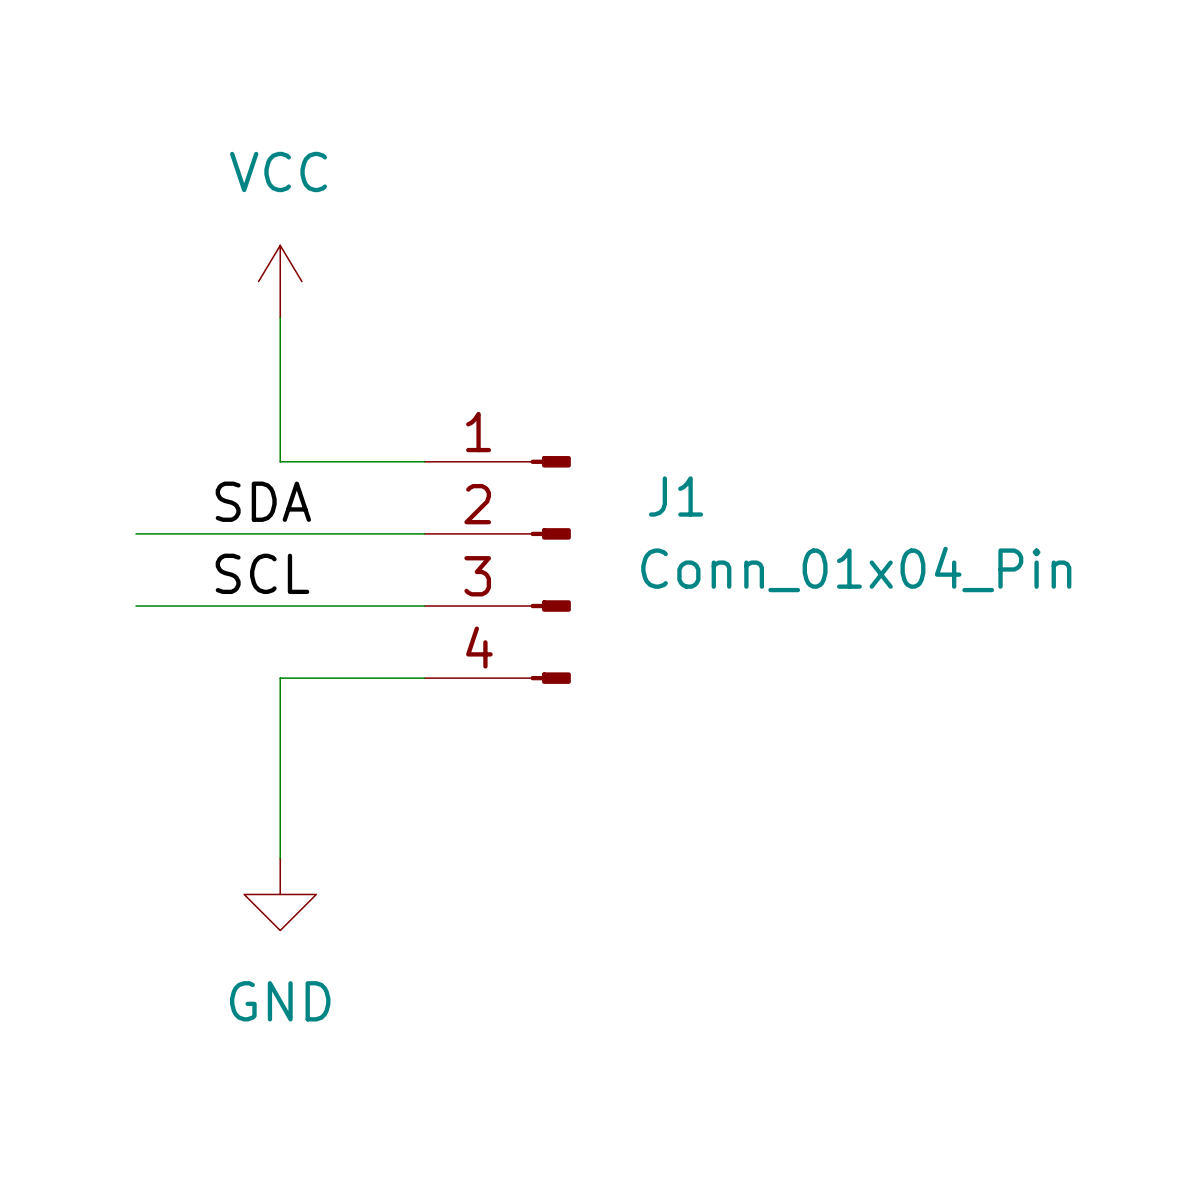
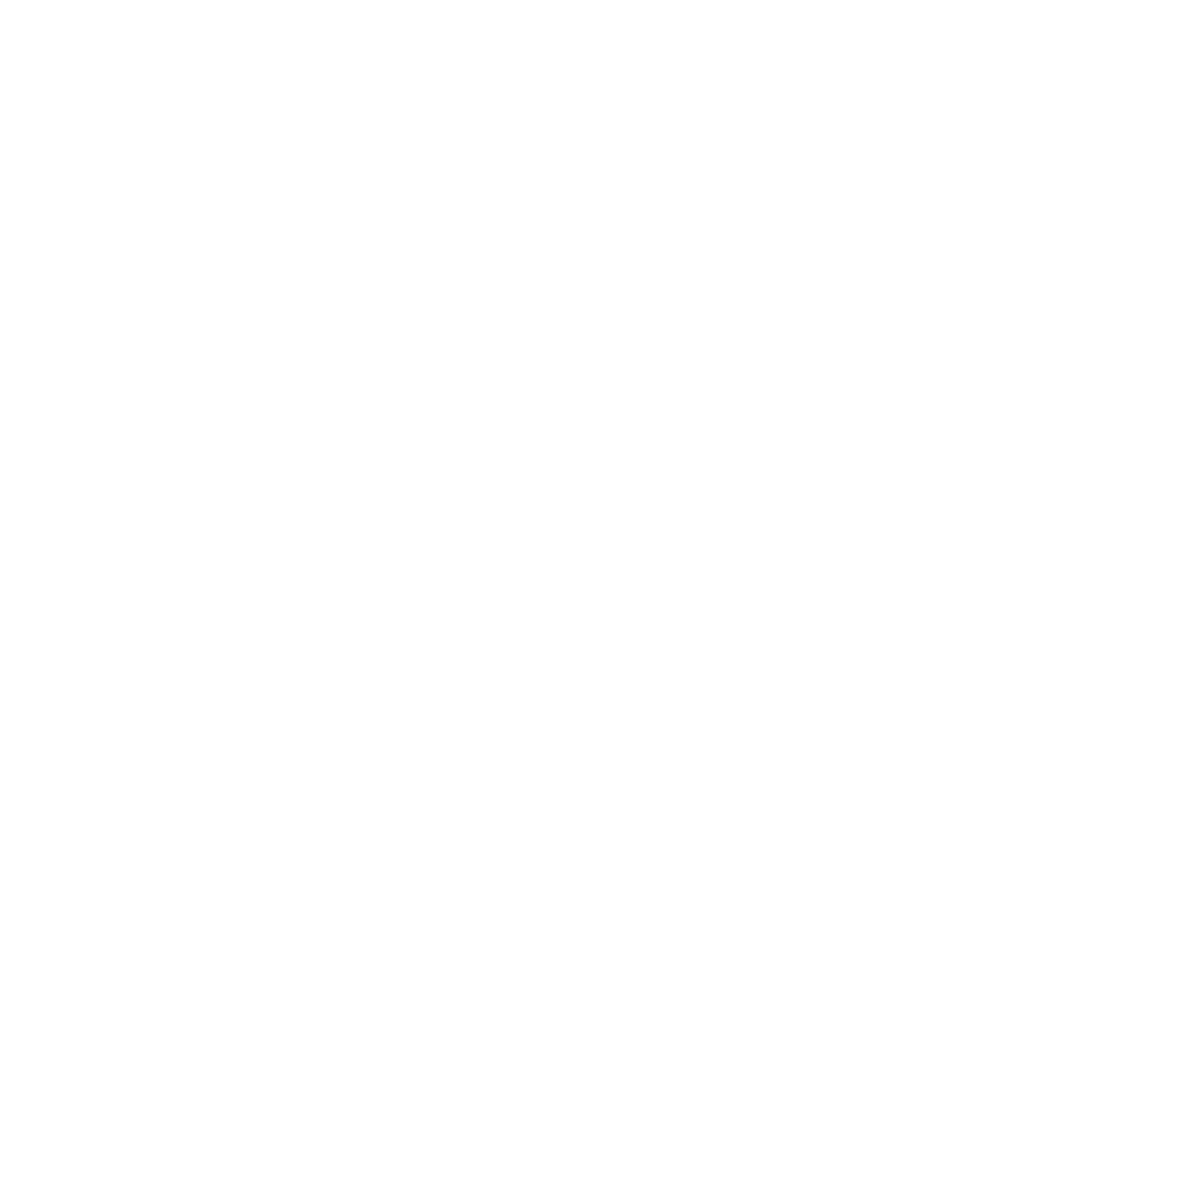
power symbol: VCC (280, 281) -> none
wire: (280, 317) (280, 461) (424, 461) -> none
label: SDA (263, 501) -> none
wire: (136, 533) (424, 533) -> none
J1: Conn_01x04_Pin (497, 569) -> none
label: SCL (262, 573) -> none
wire: (136, 606) (424, 606) -> none
wire: (424, 678) (280, 678) (280, 858) -> none
power symbol: GND (280, 894) -> none

